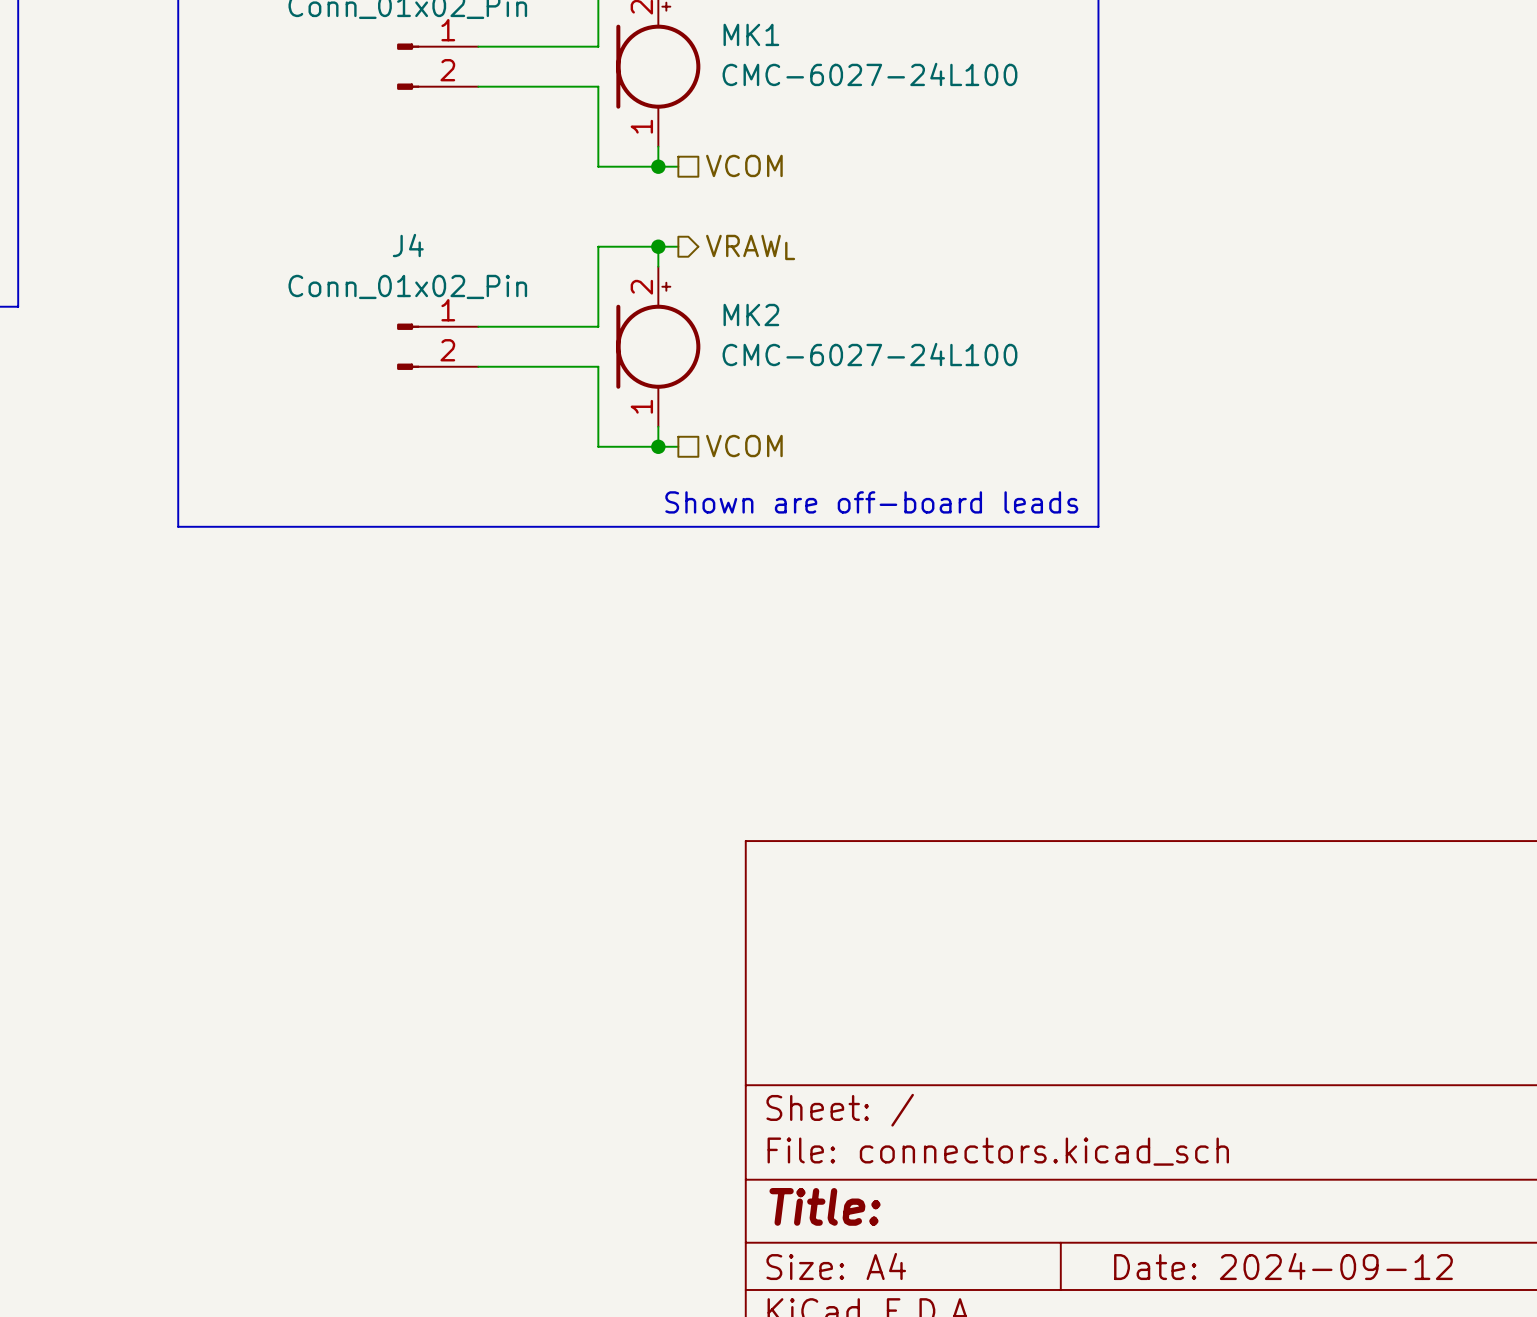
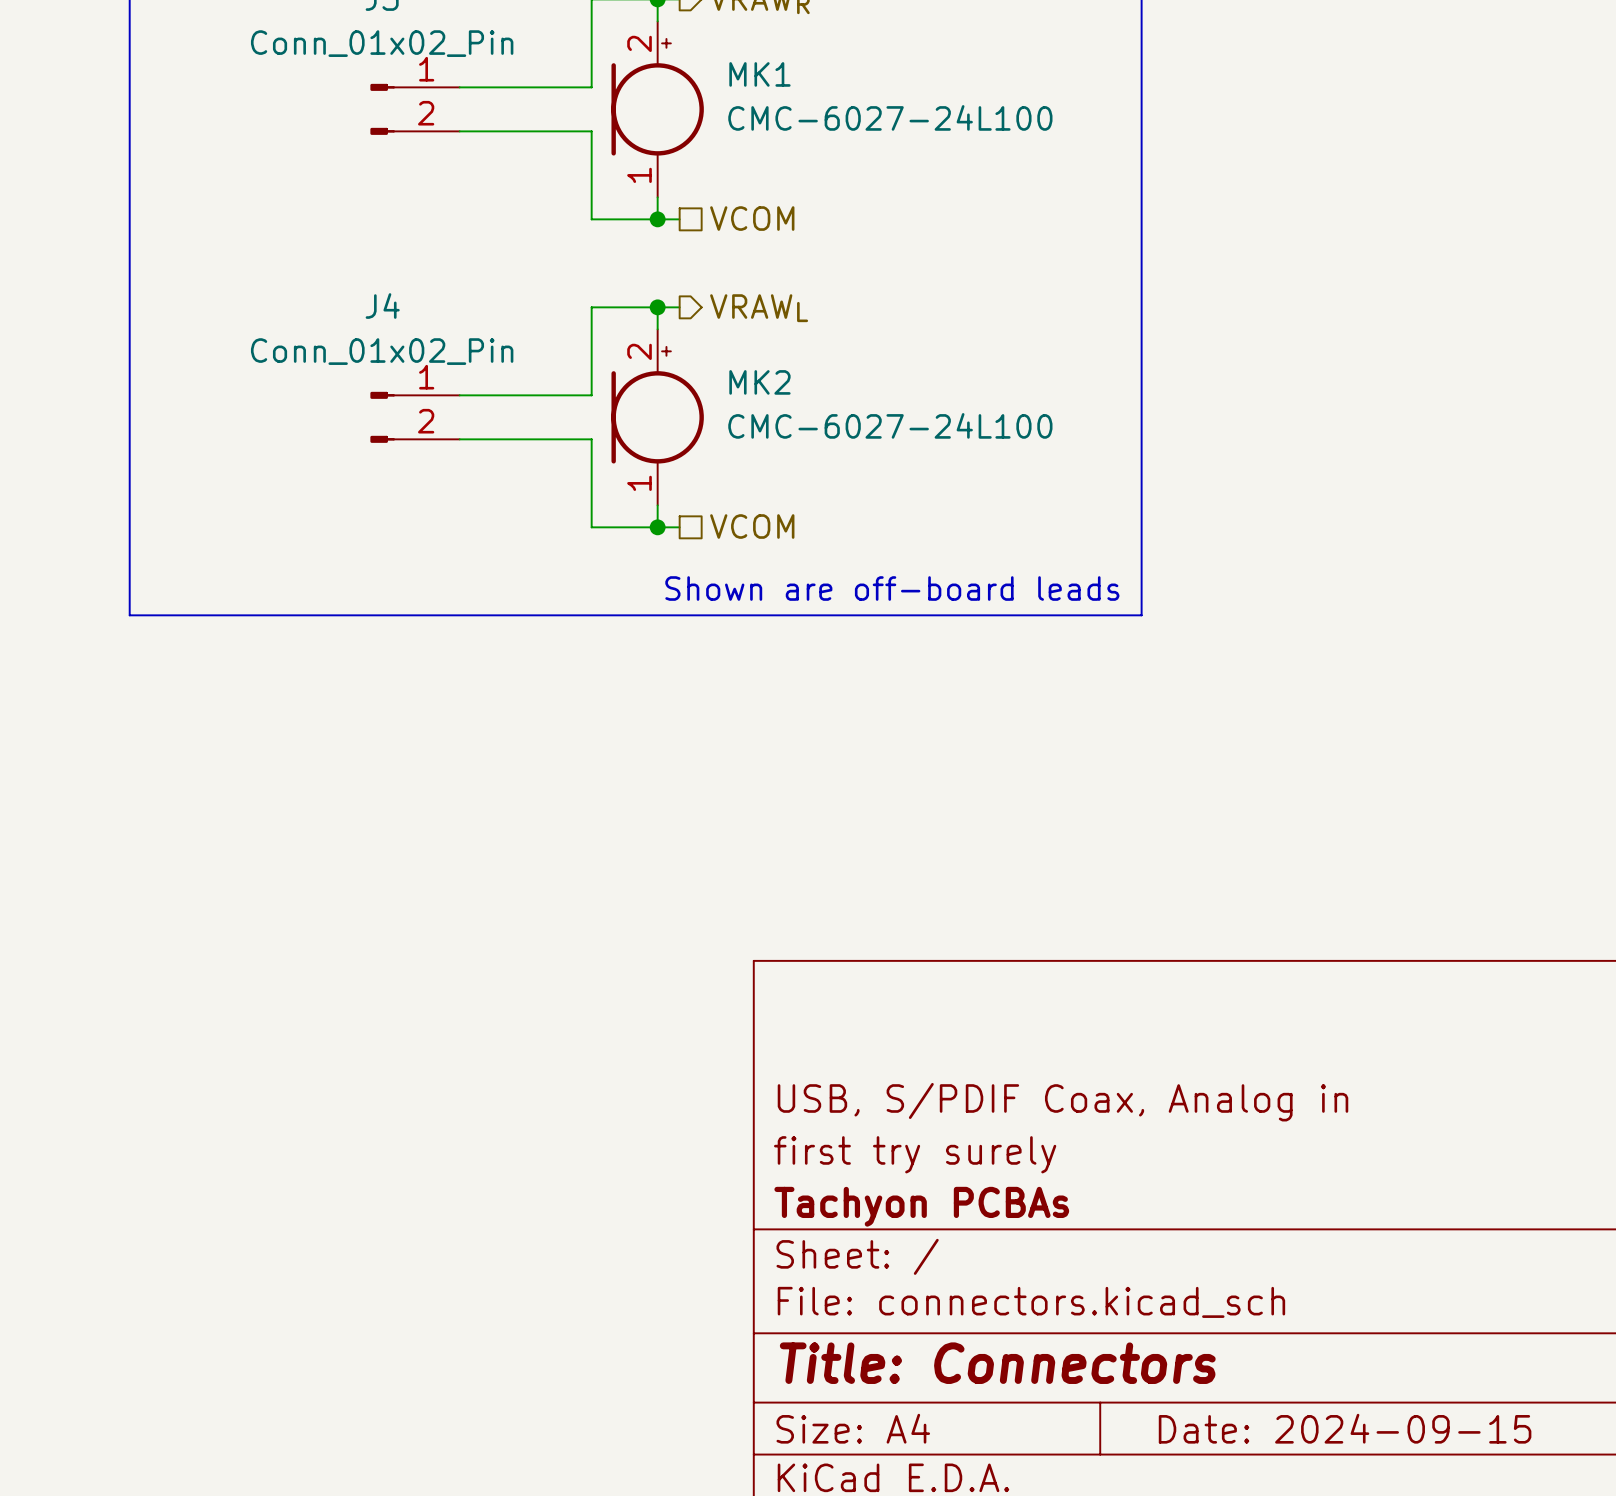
title block: none -> USB, S/PDIF Coax, Analog in (1062, 1102)
title block: none -> first try surely (915, 1154)
title block: none -> Tachyon PCBAs (921, 1206)
title block: Title: (825, 1206) -> Title: Connectors (997, 1363)
title block: Date: 2024-09-12 (1283, 1266) -> Date: 2024-09-15 (1345, 1428)

